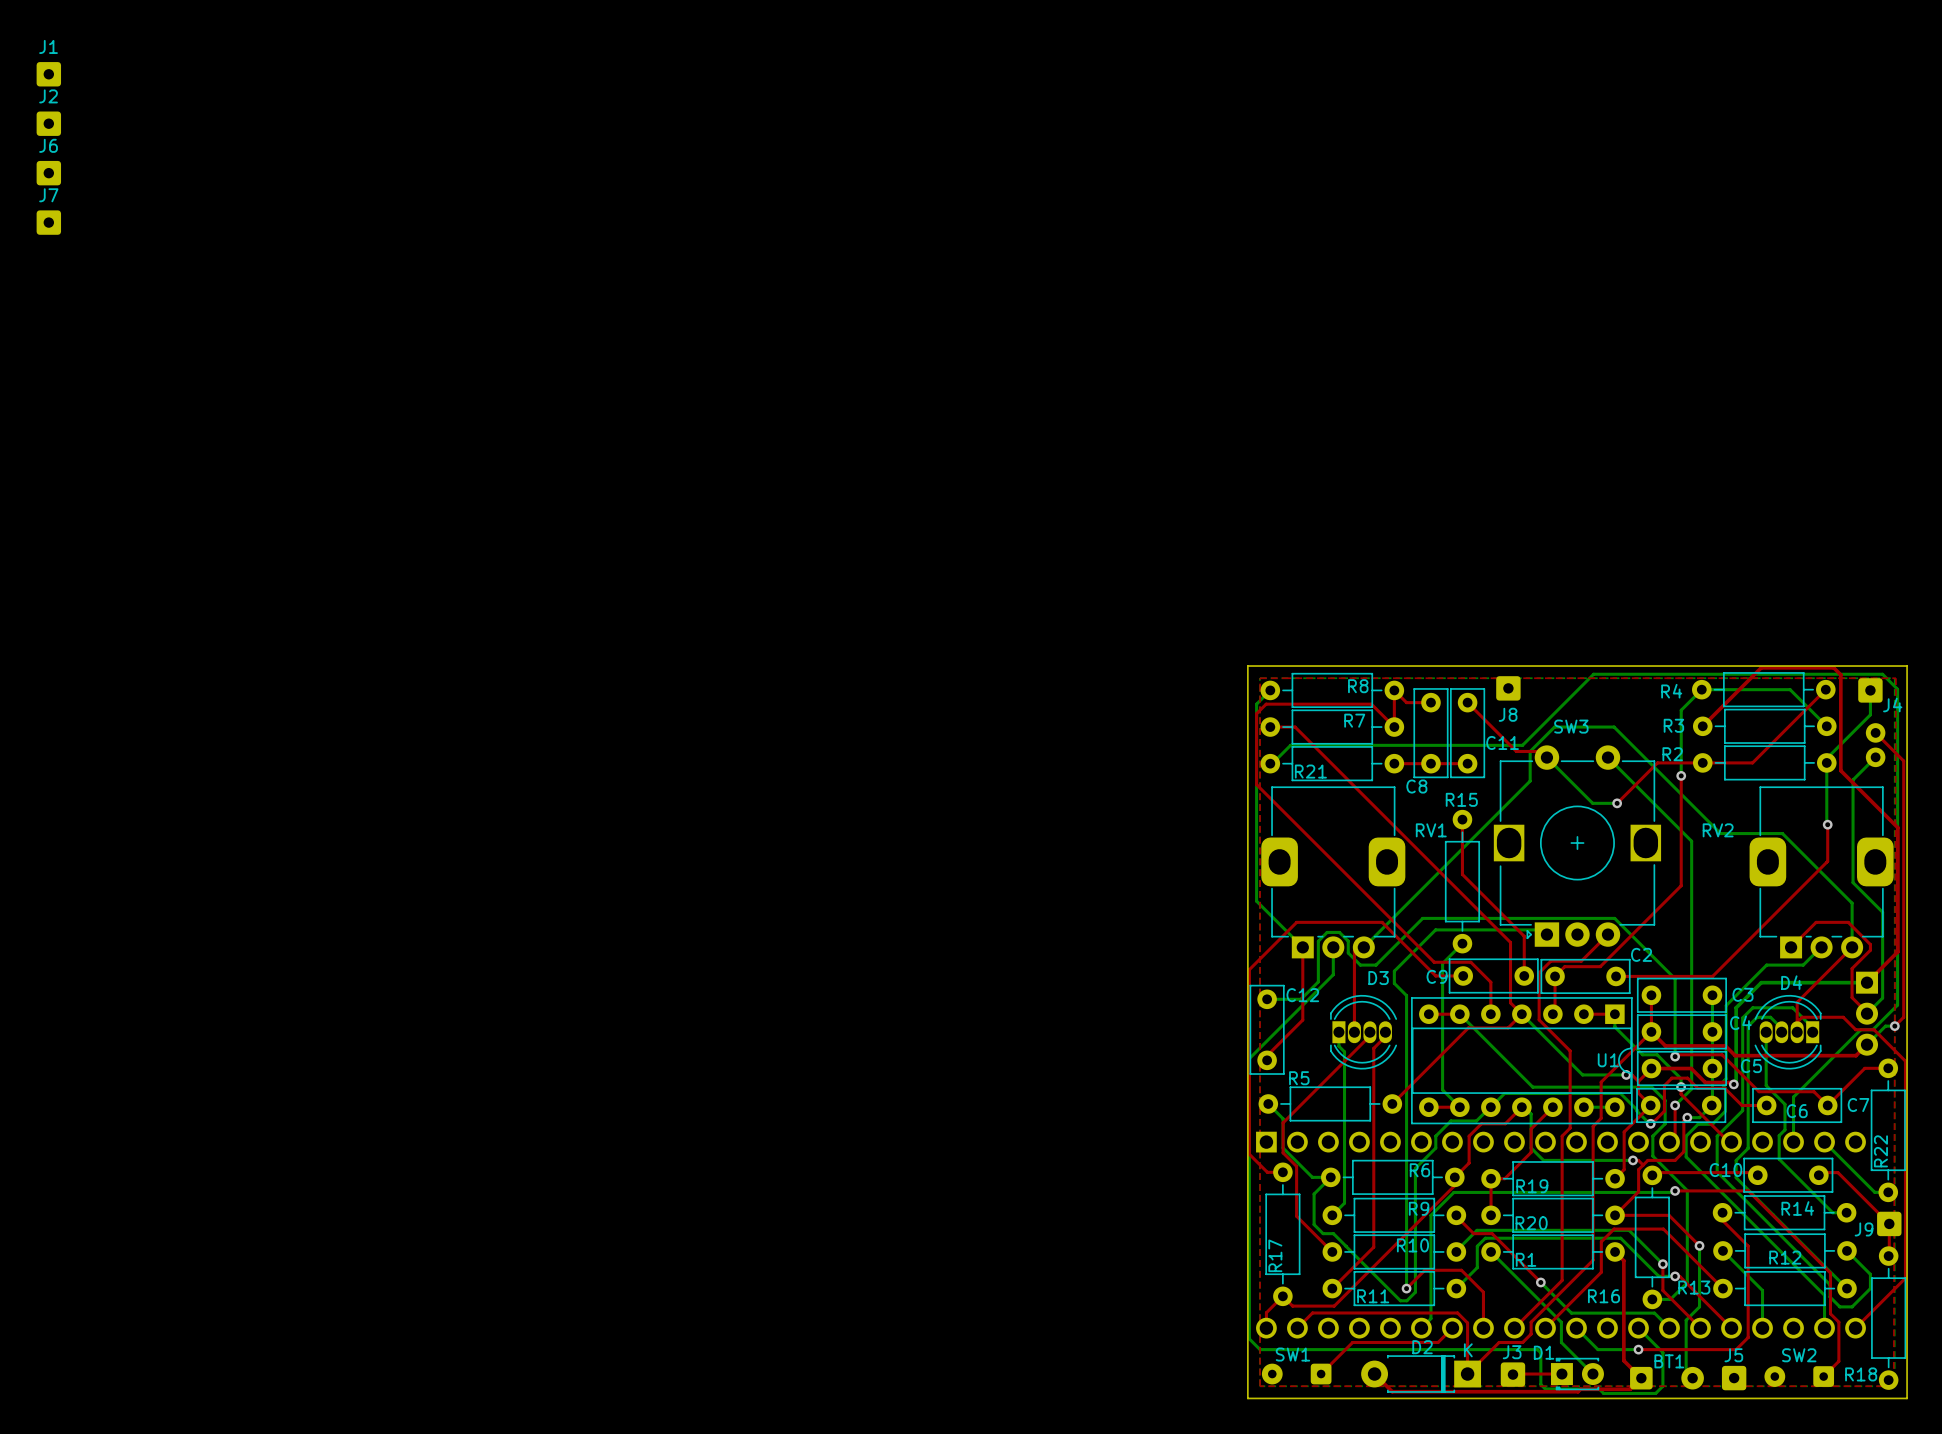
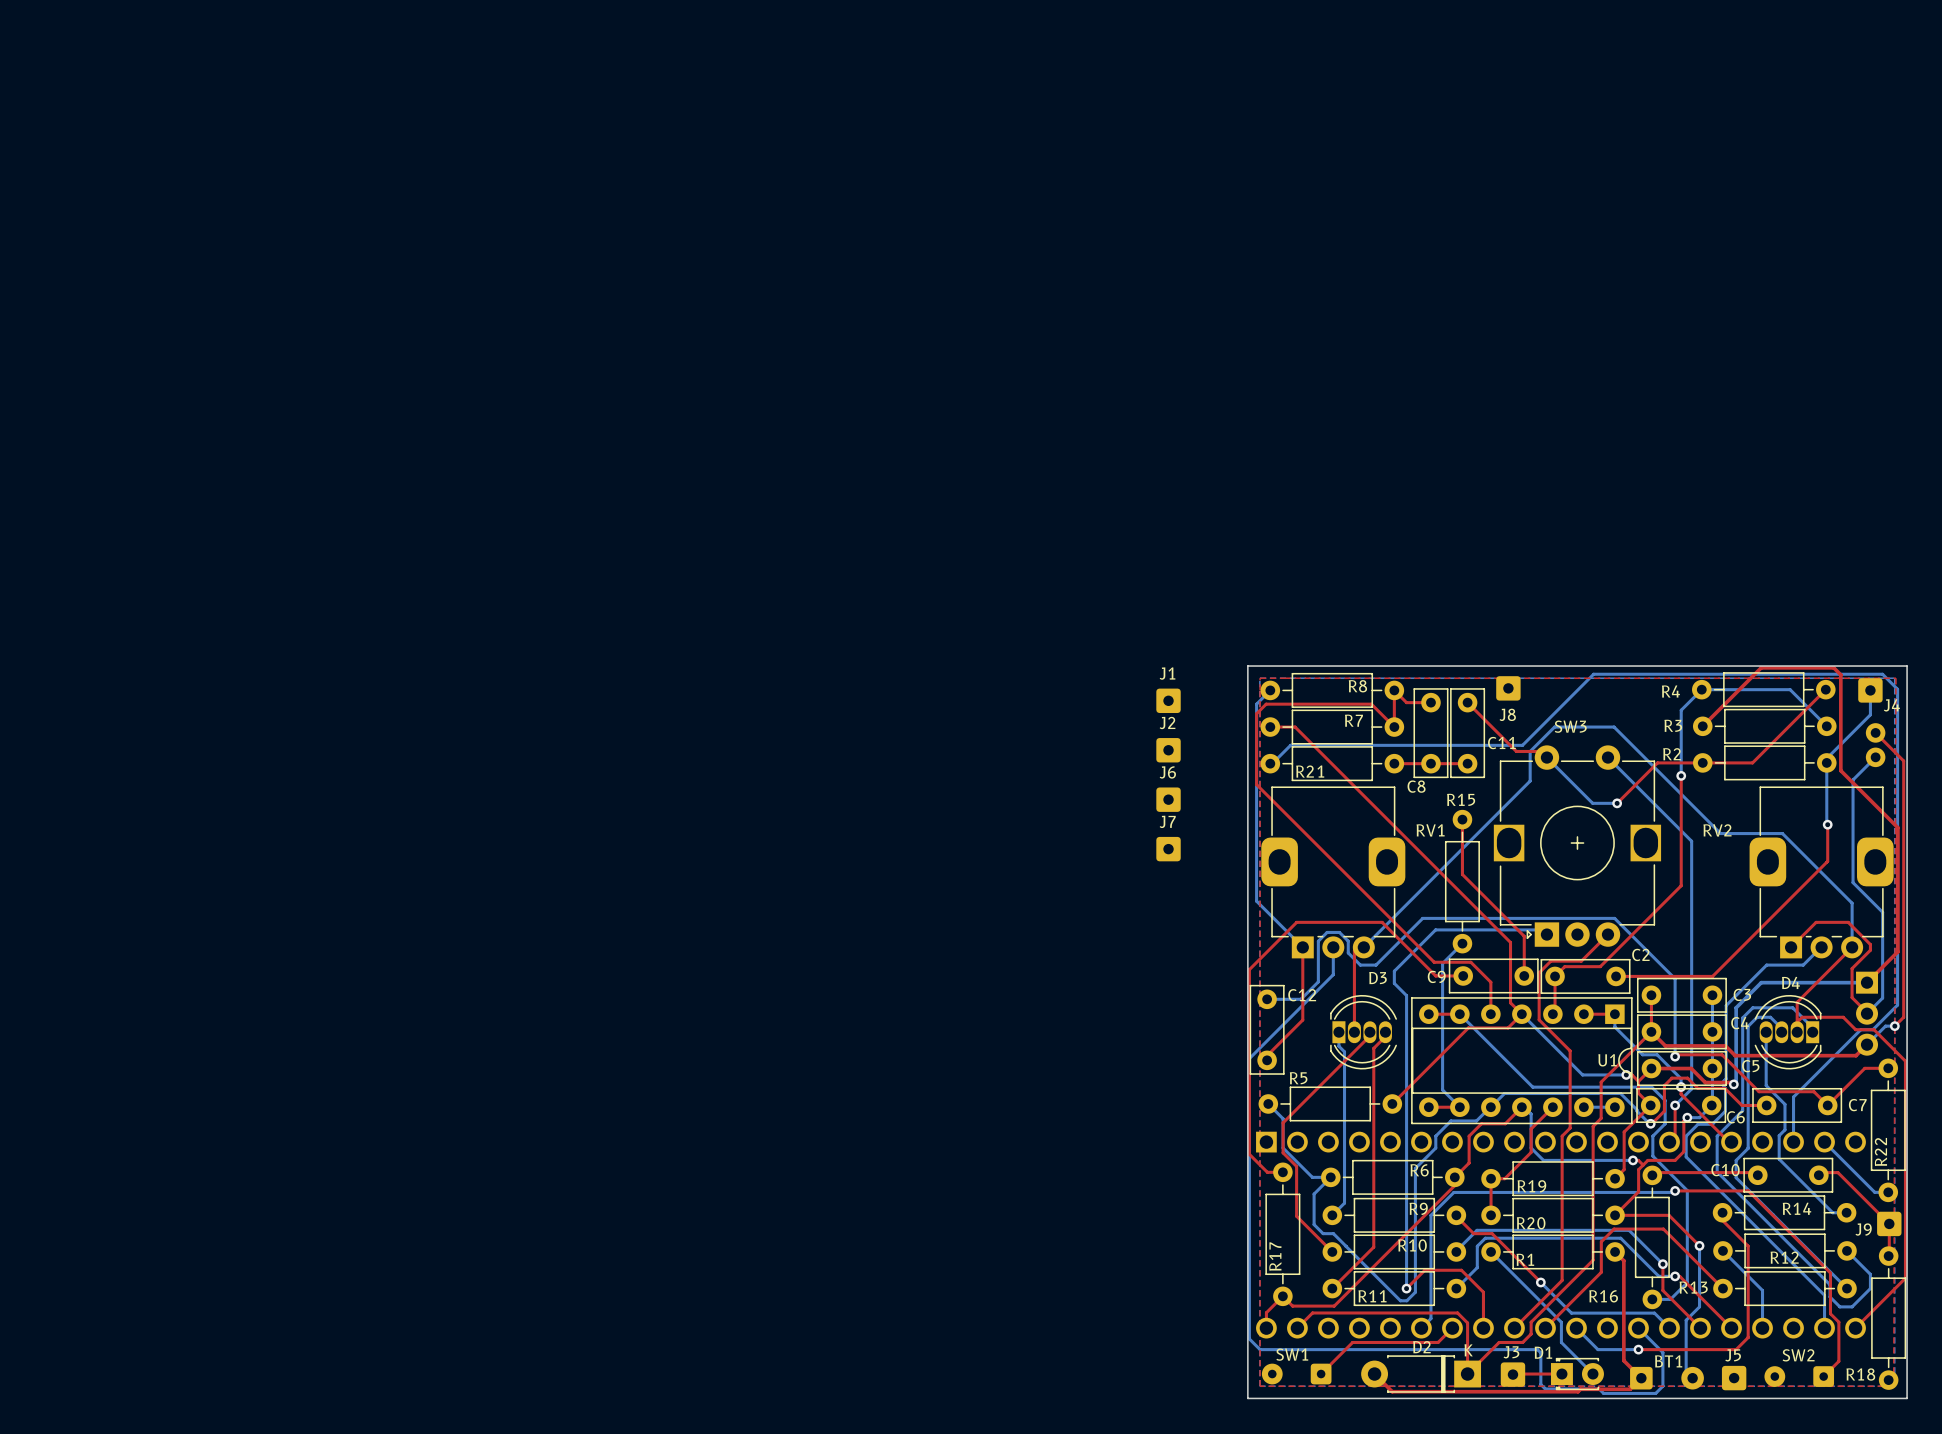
J1 position: (48, 74) -> (1168, 700)
J2 position: (48, 123) -> (1168, 750)
J6 position: (48, 173) -> (1168, 799)
J7 position: (48, 222) -> (1168, 849)
C6 name position: C6 (1797, 1111) -> C6 (1735, 1117)

